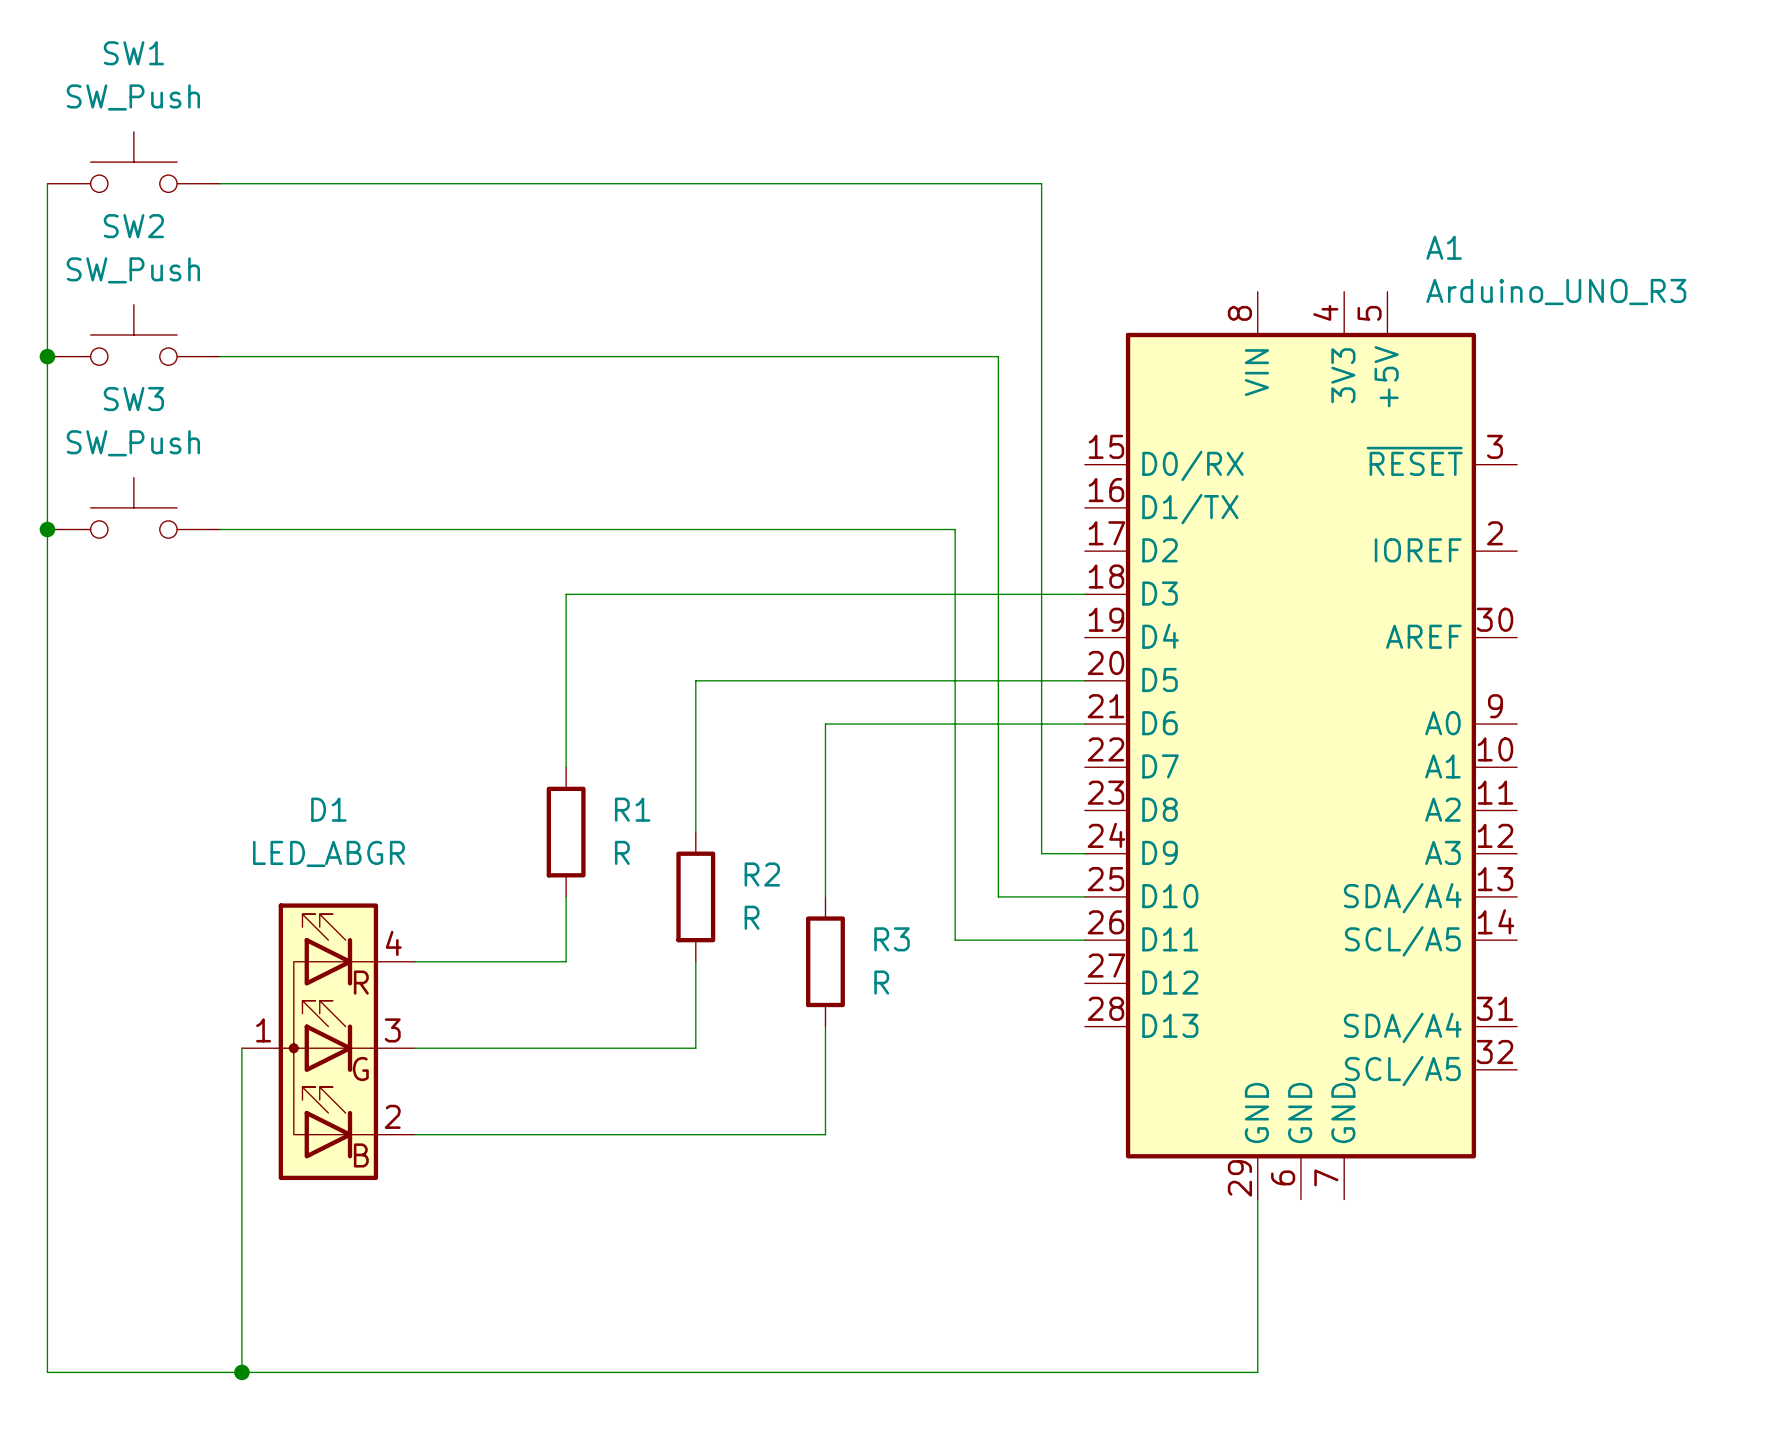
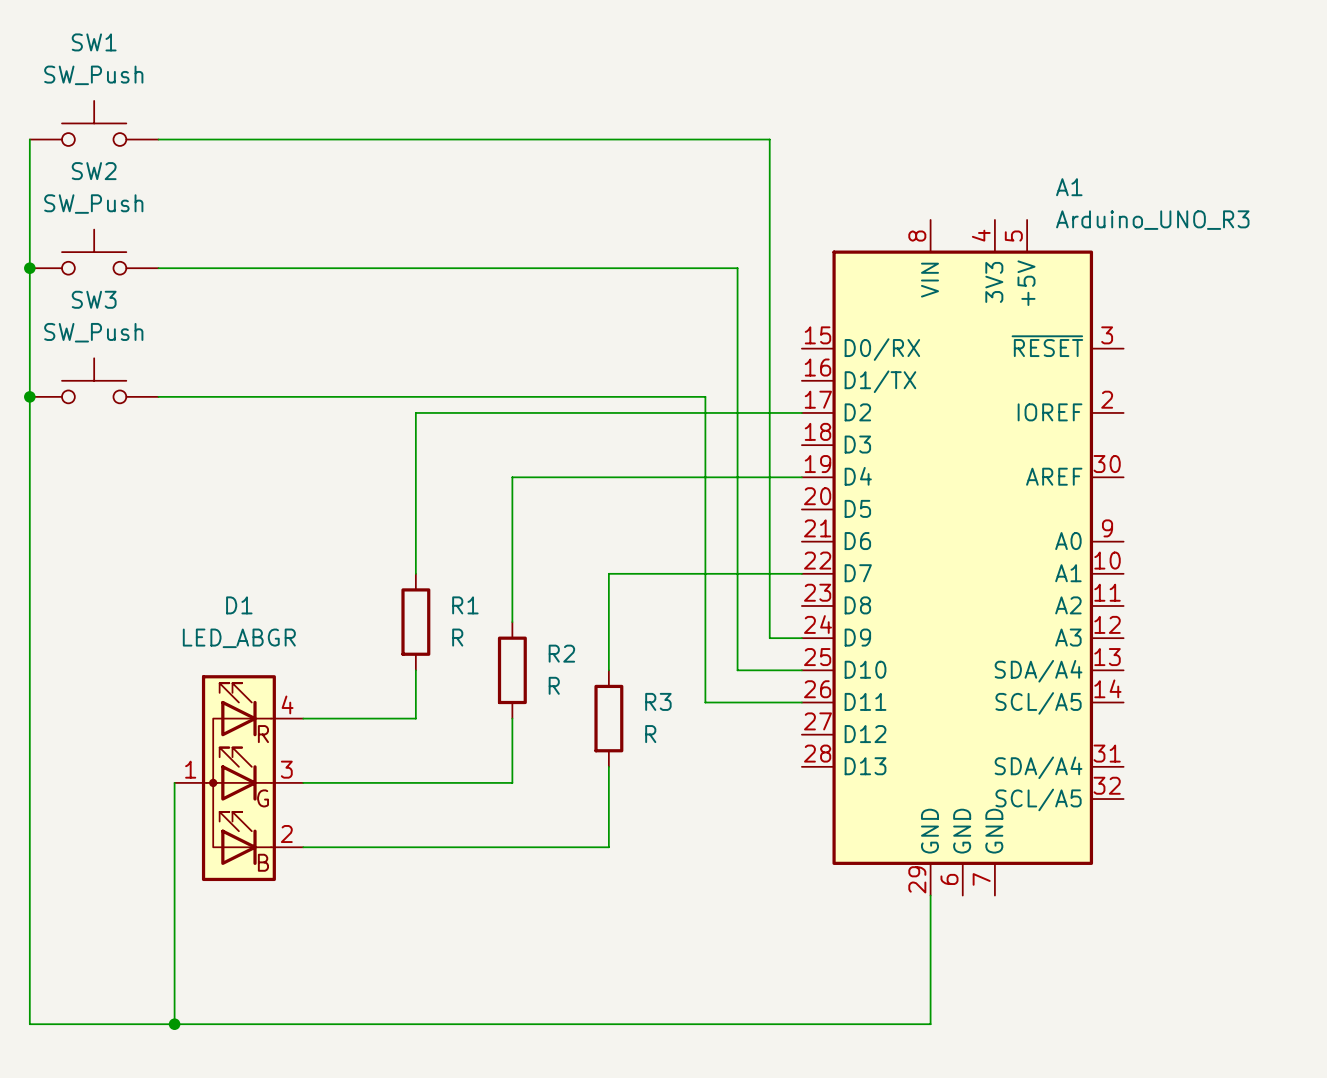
wire: (566, 594) (1084, 594) -> (415, 445) (415, 412) (801, 412)
wire: (695, 680) (1084, 680) -> (512, 509) (512, 477) (801, 477)
wire: (1084, 724) (825, 724) (825, 767) -> (801, 573) (608, 573)

